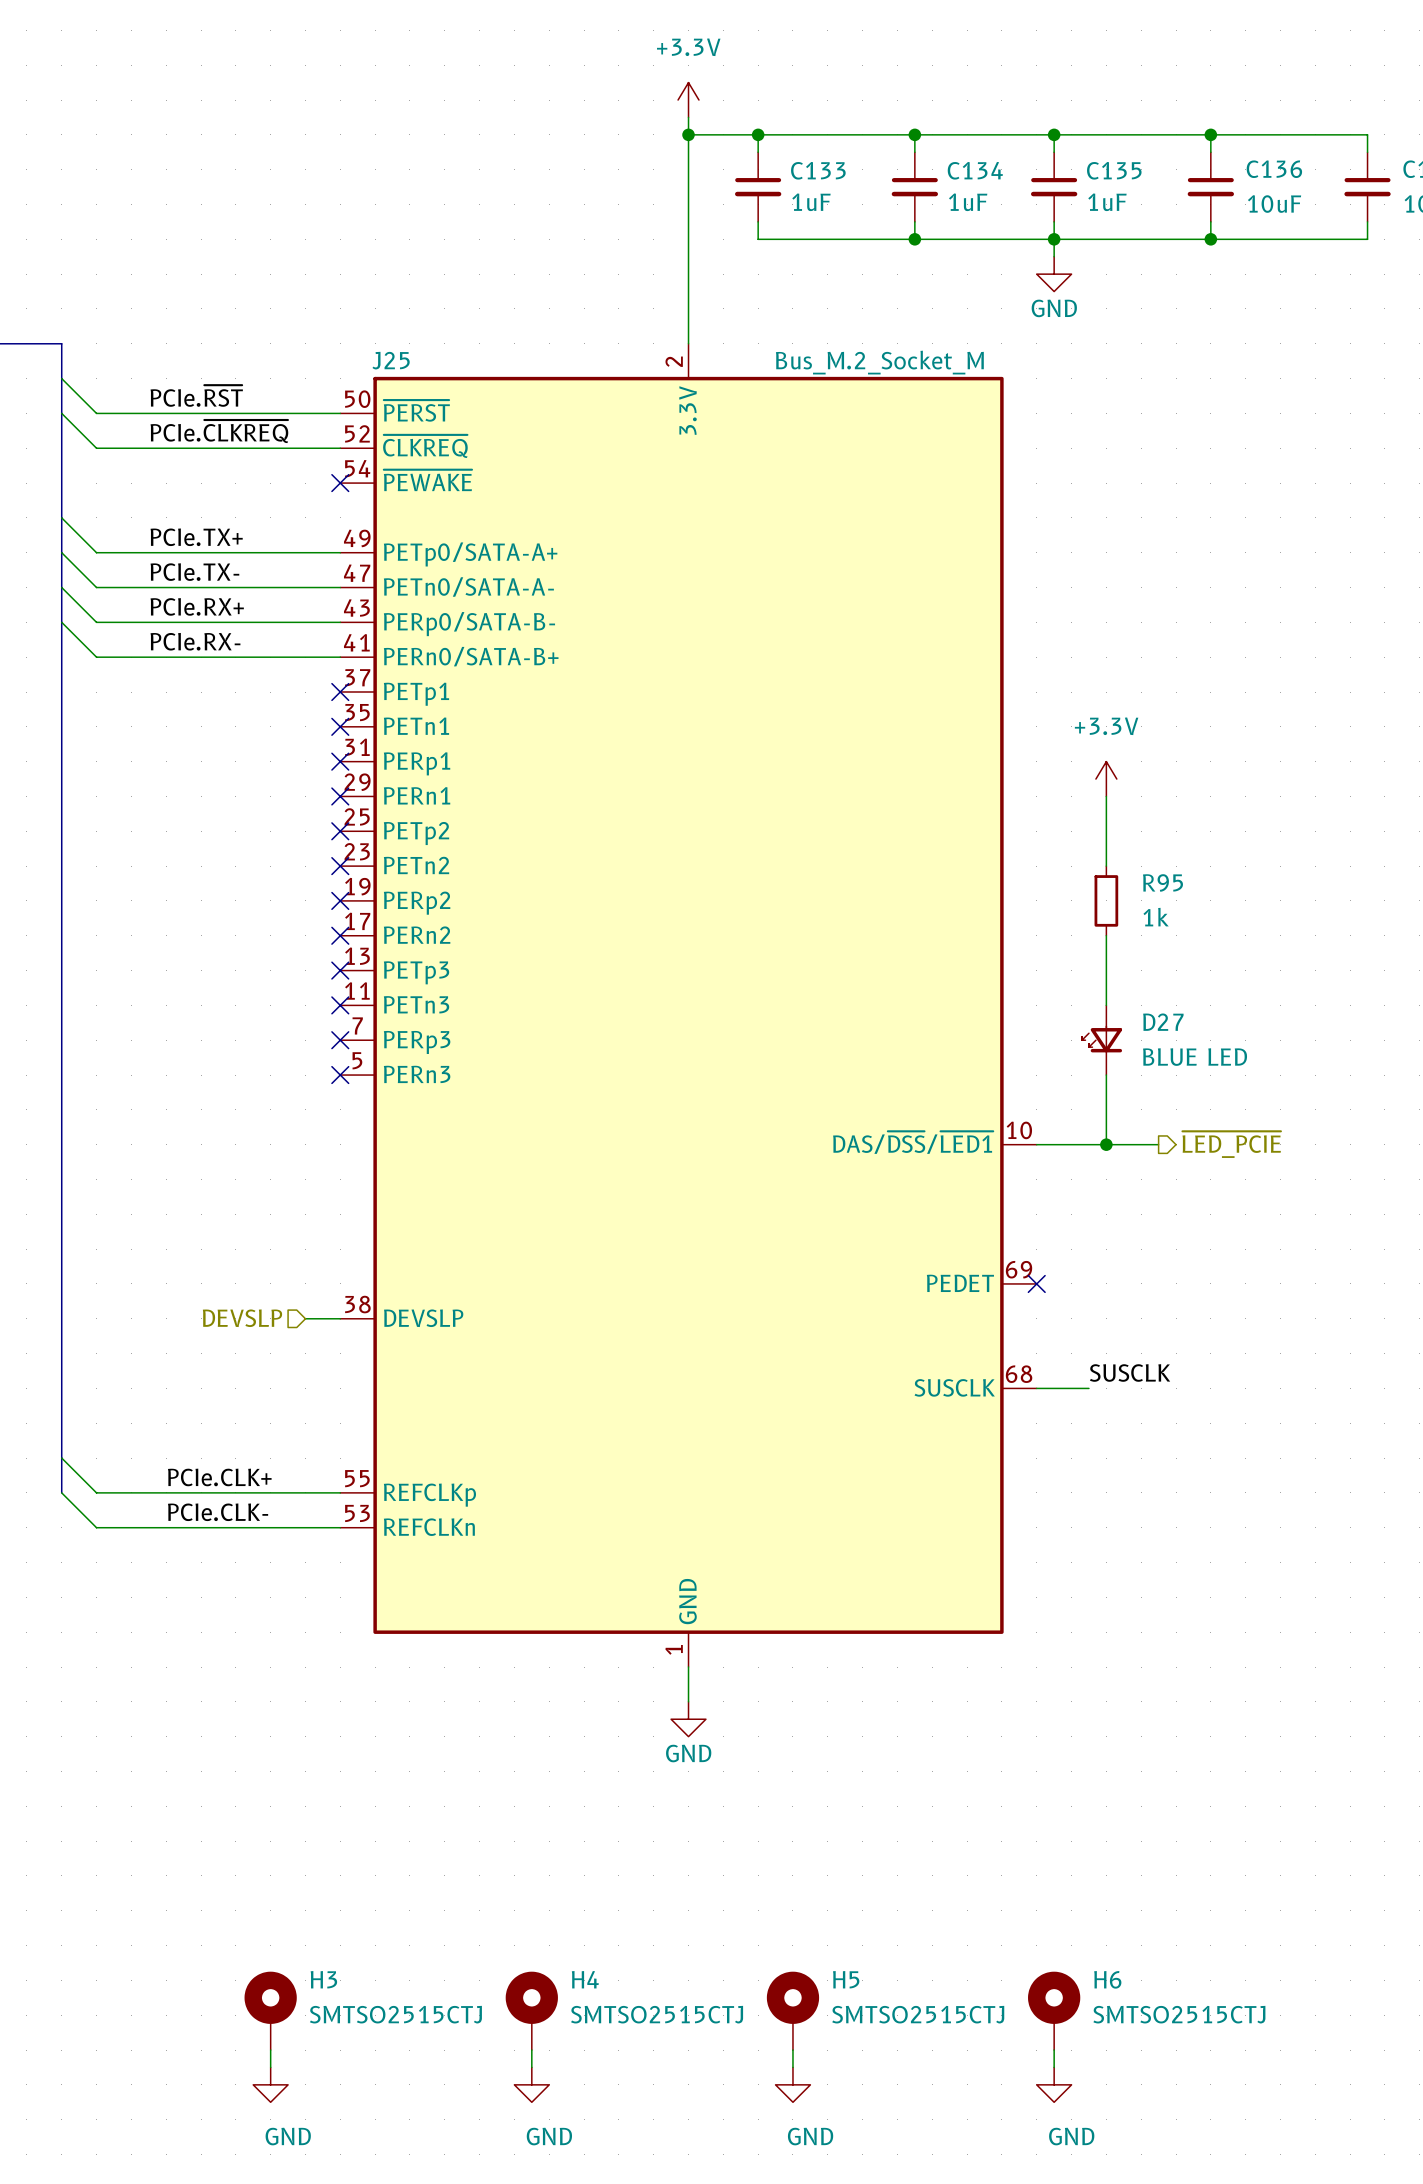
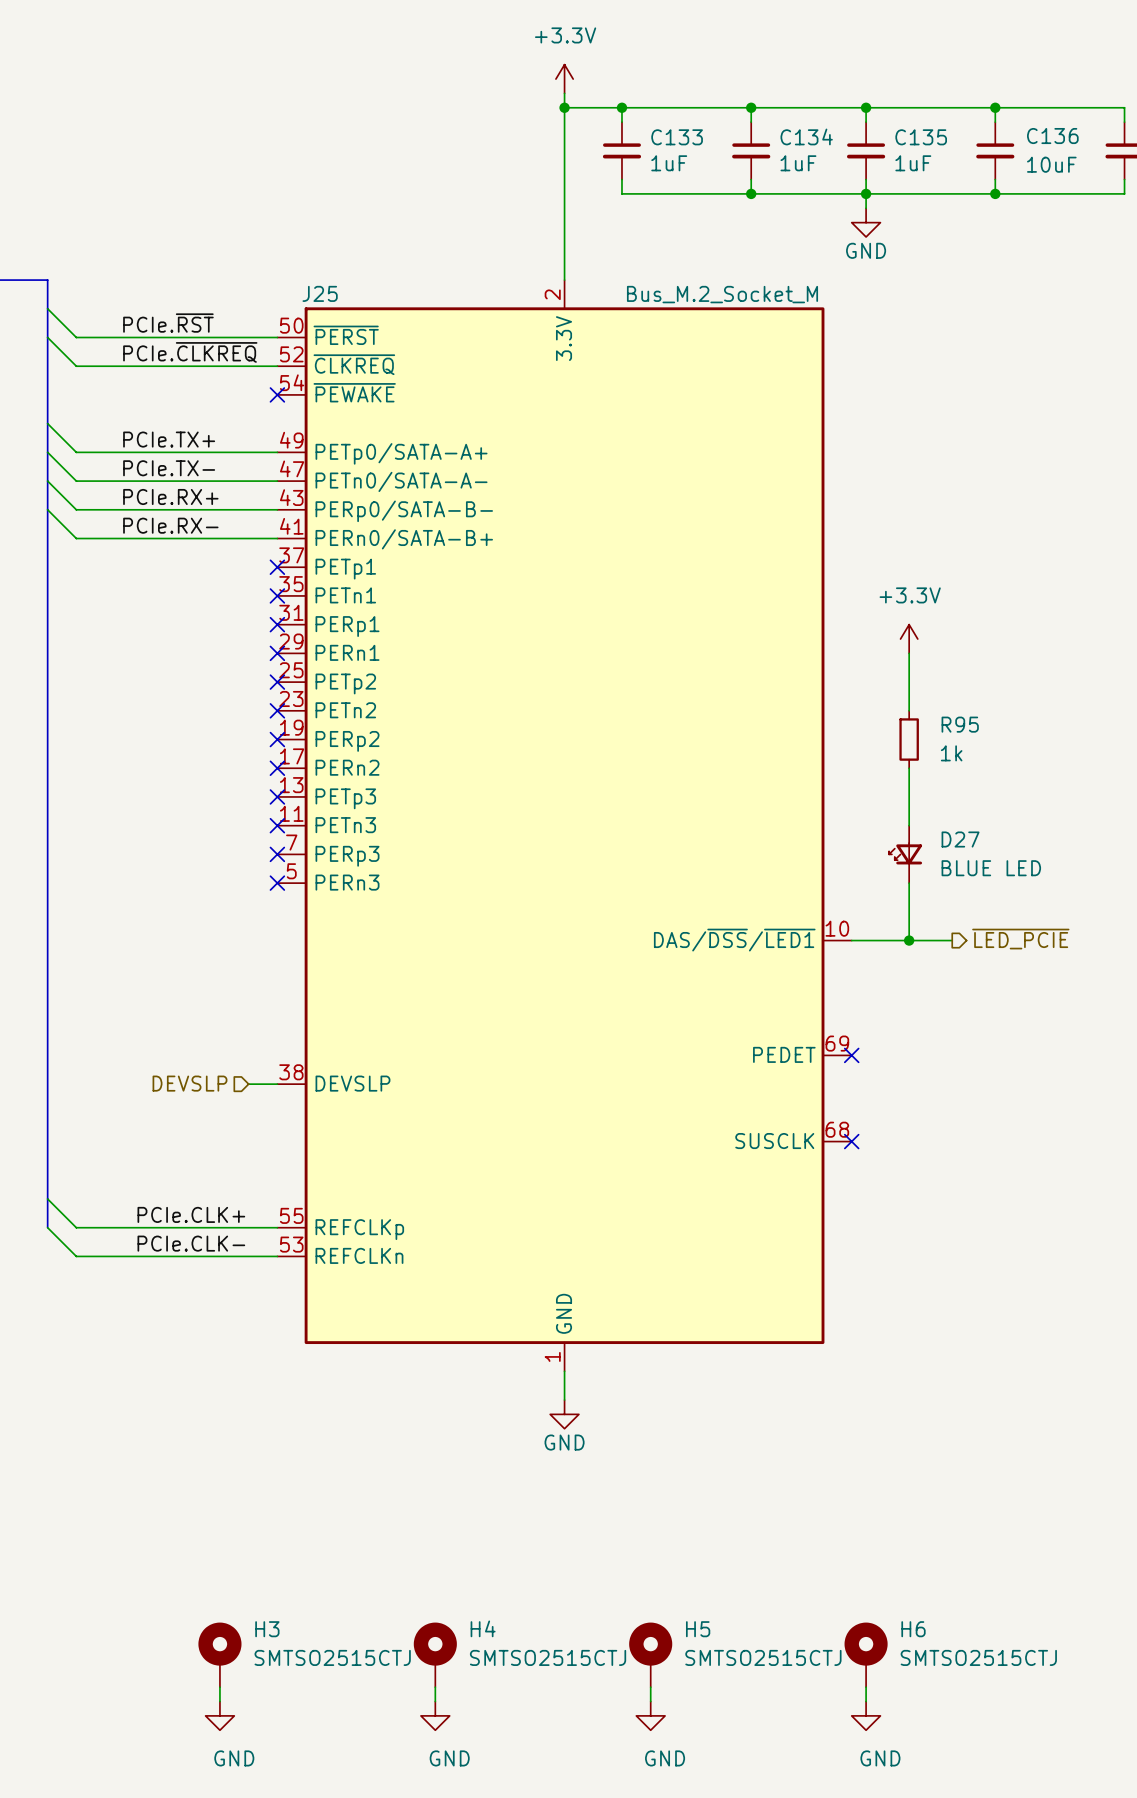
label: SUSCLK (1130, 1372) -> none
wire: (1036, 1388) (1088, 1388) -> none
no-connect mark: none -> (851, 1141)

